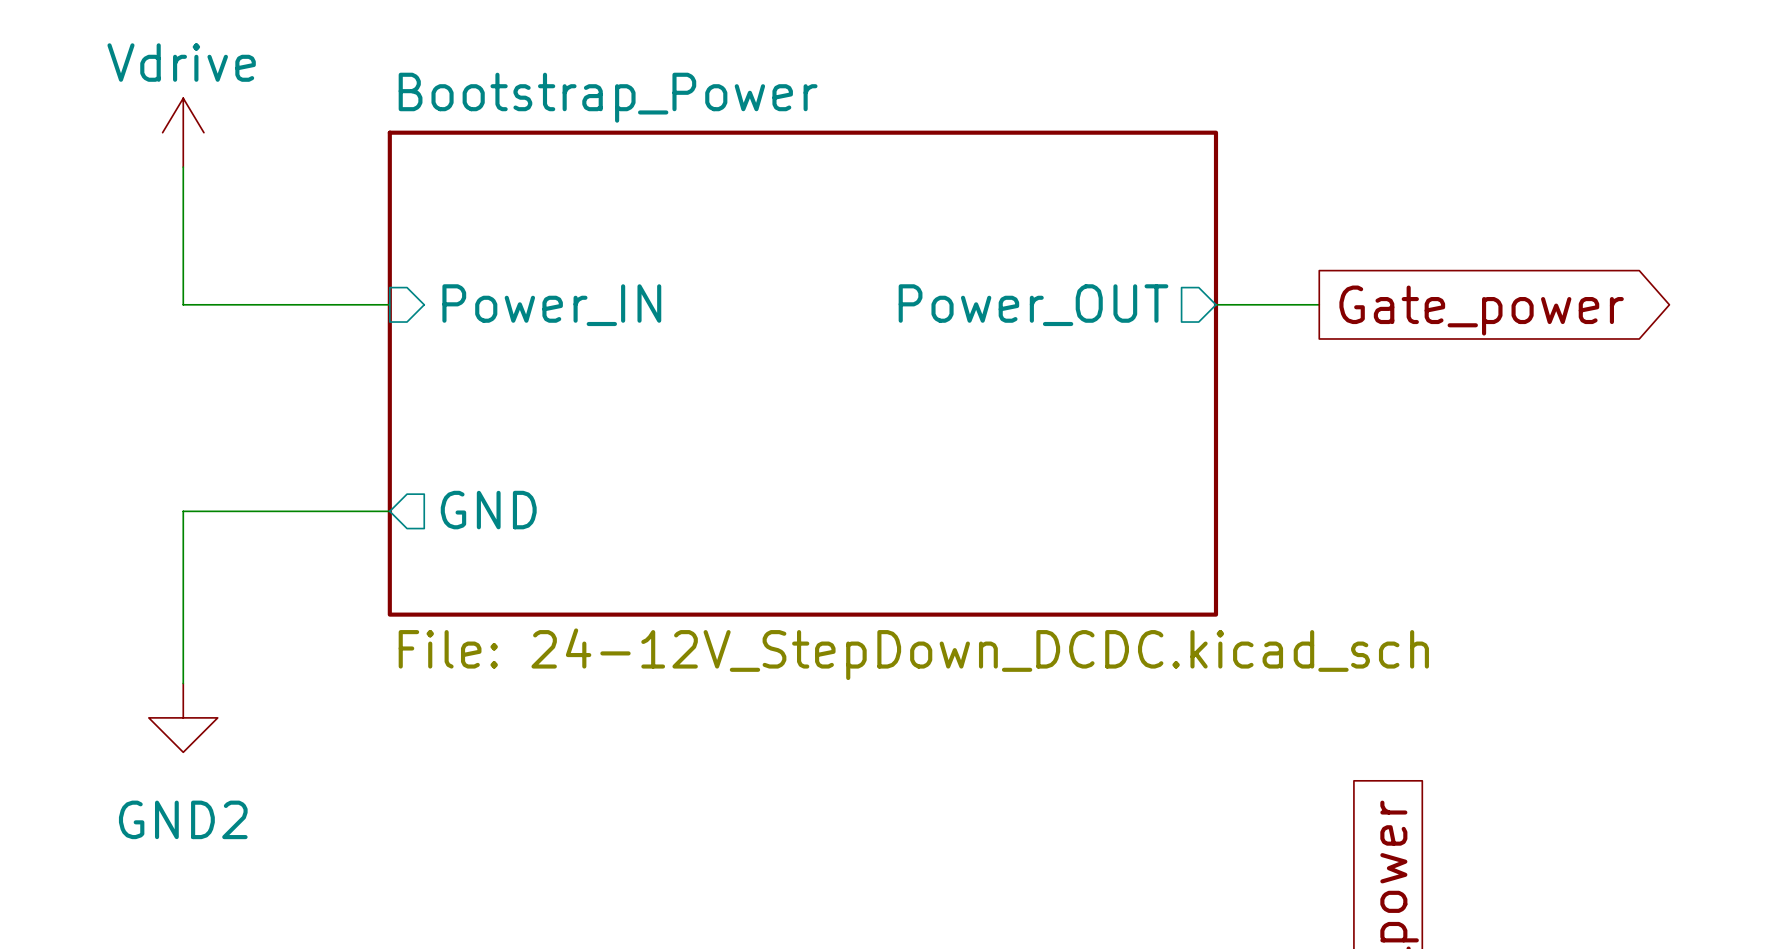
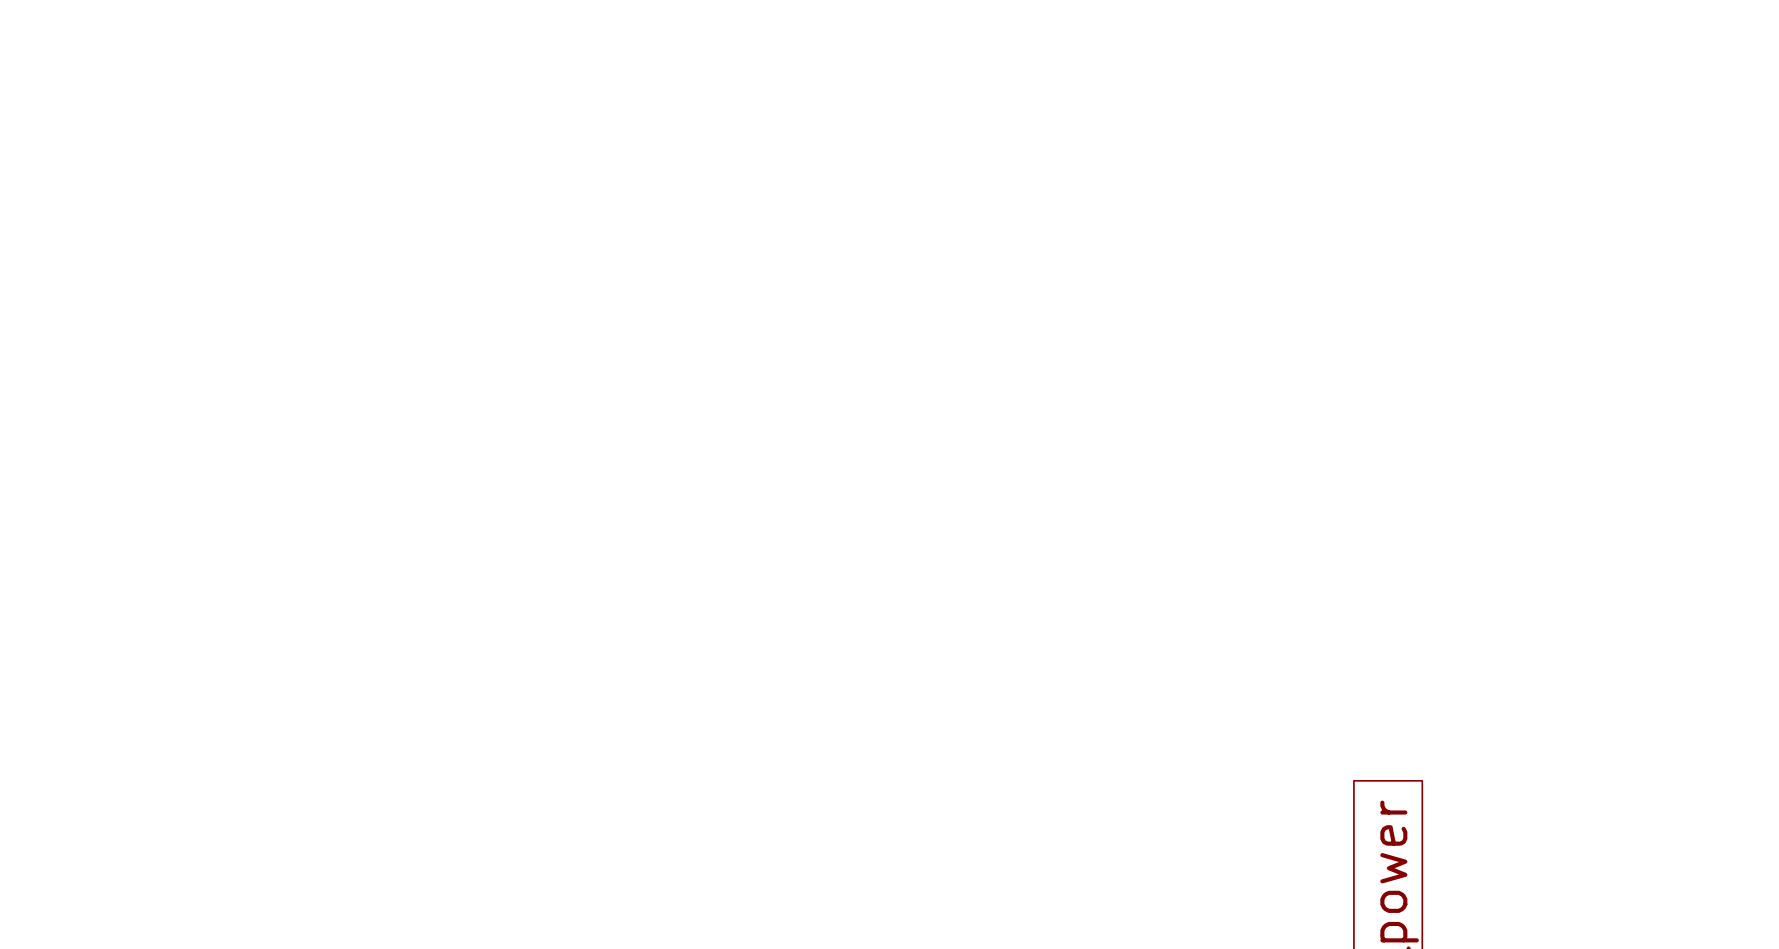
power symbol: Vdrive (183, 132) -> none
wire: (183, 167) (183, 304) (389, 304) -> none
wire: (1215, 304) (1319, 304) -> none
sheet pin: Power_IN (551, 305) -> none
sheet pin: Power_OUT (1033, 305) -> none
global label: Gate_power (1481, 310) -> none
sheet Bootstrap_Power: File: 24-12V_StepDown_DCDC.kicad_sch (802, 373) -> none
sheet pin: GND (488, 510) -> none
wire: (389, 511) (183, 511) (183, 683) -> none
power symbol: GND2 (183, 717) -> none

